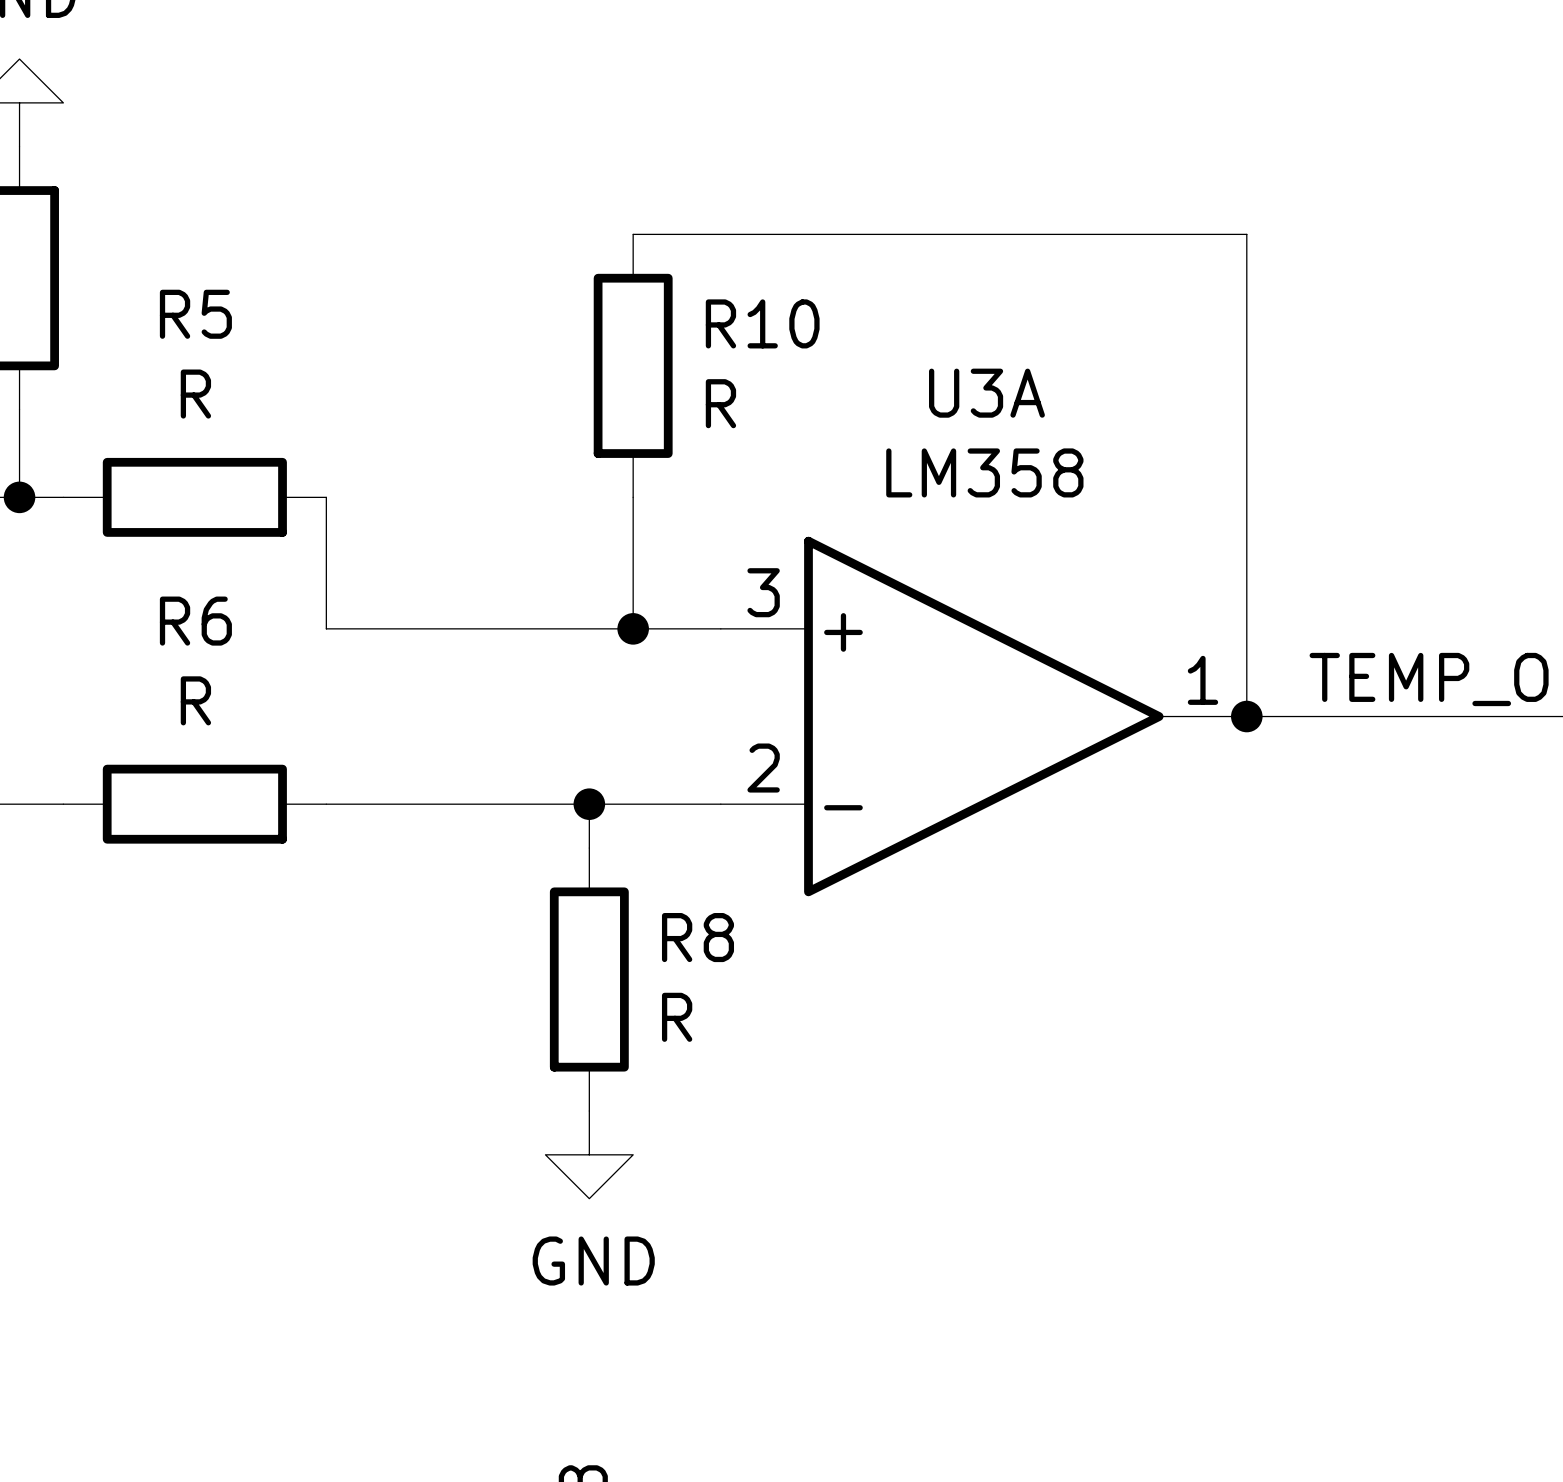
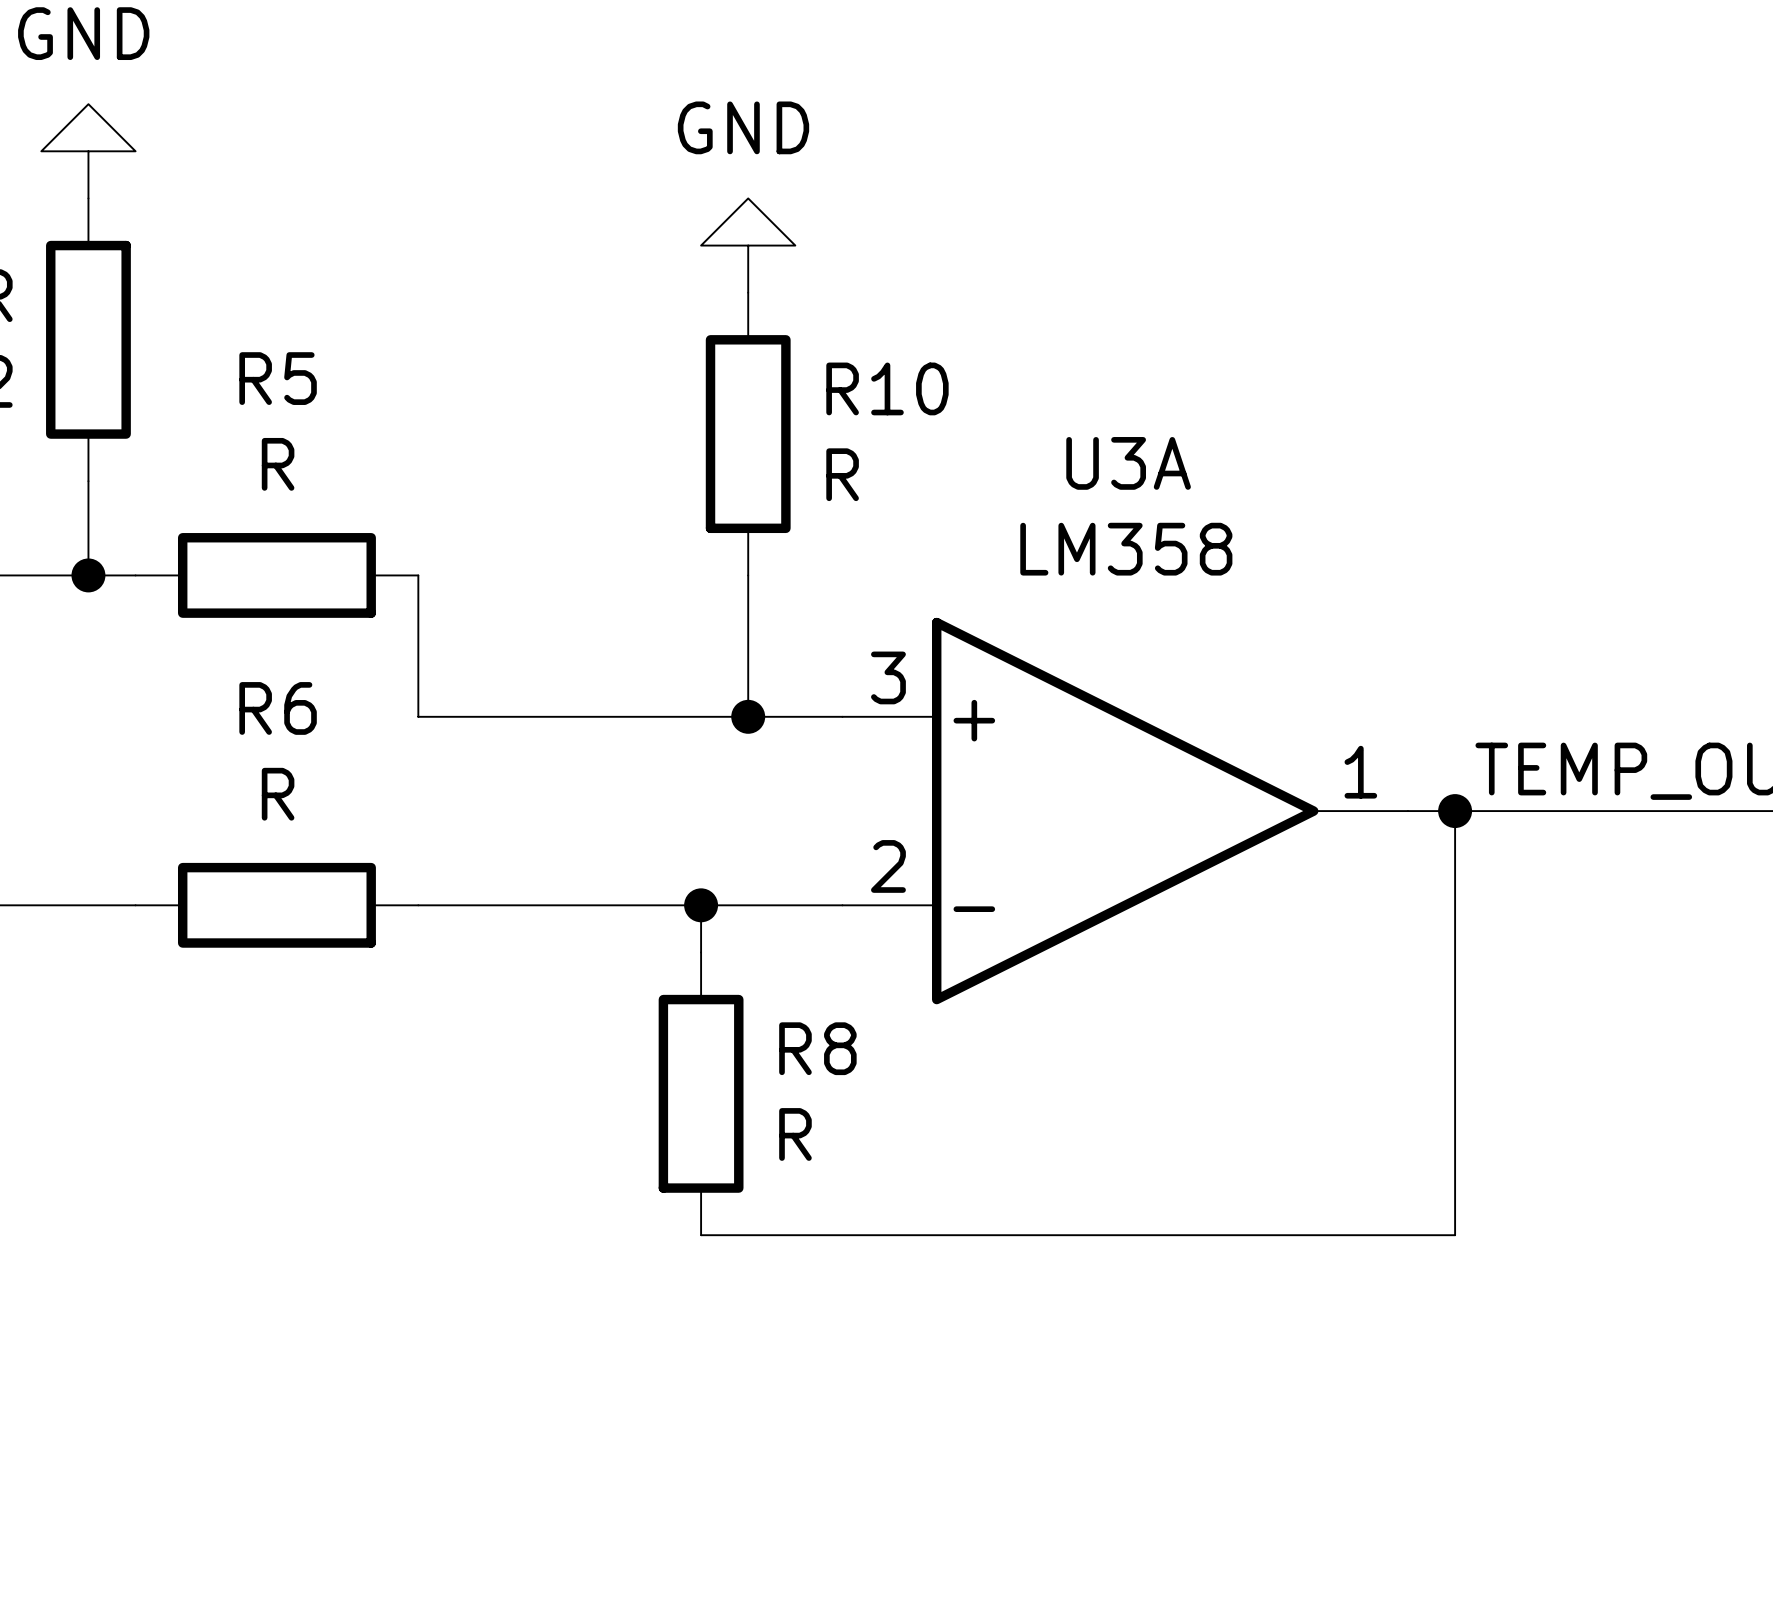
power symbol: none -> GND (748, 245)
wire: (633, 234) (1246, 234) (1246, 716) -> none
junction position: (1246, 716) -> (1455, 811)
wire: none -> (1455, 811) (1455, 1235) (701, 1235)
power symbol: GND (589, 1154) -> none

